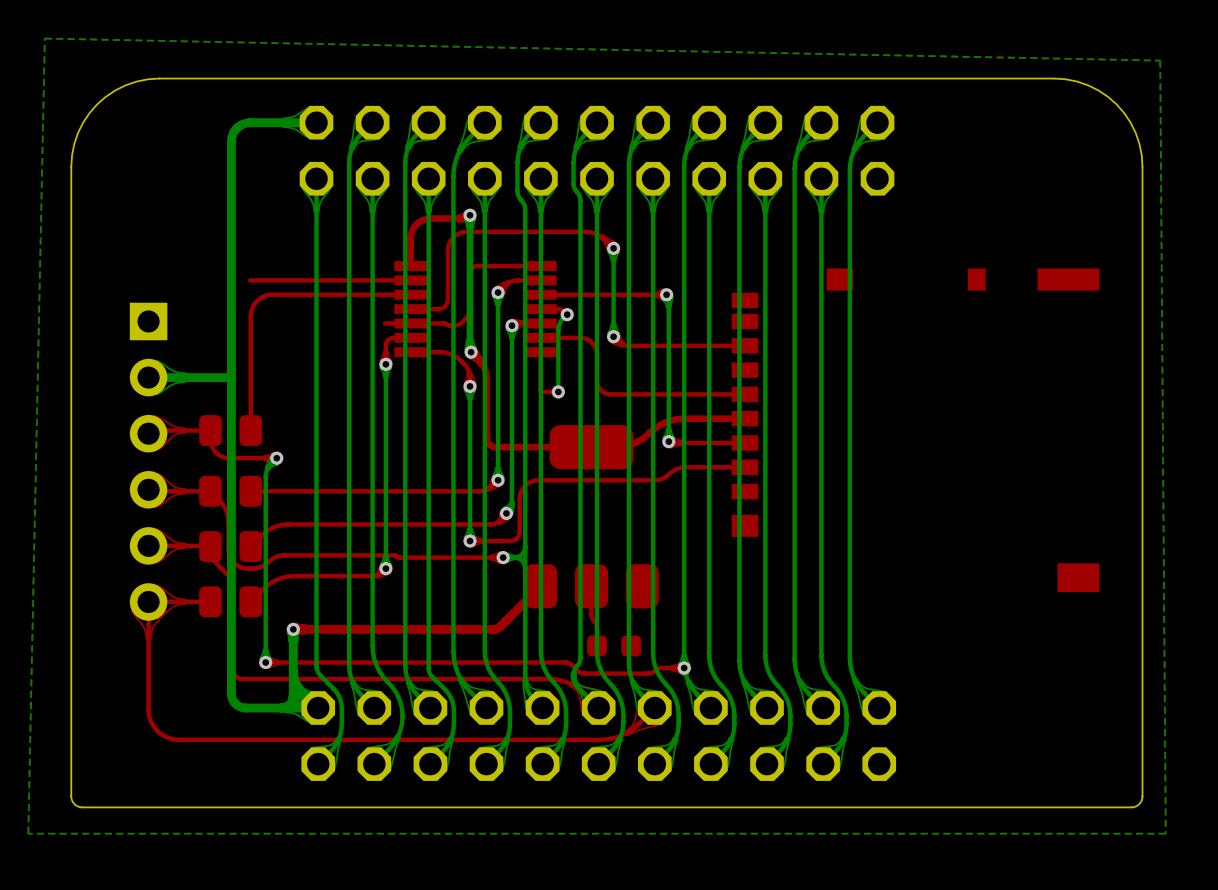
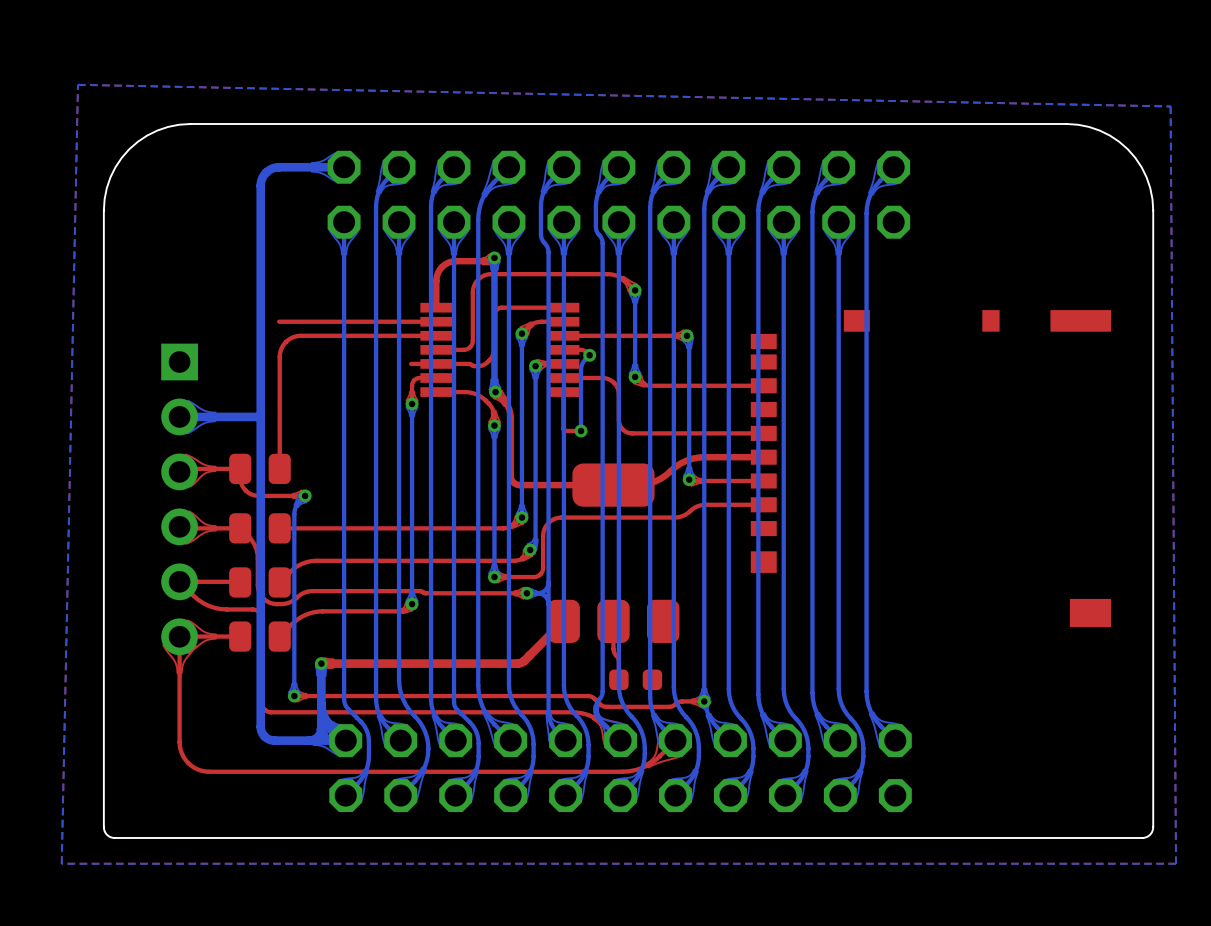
top zone outline: (156, 528) (139, 545) (156, 562) (174, 550) (185, 548) (185, 543) (174, 541) (156, 528) -> none
top track: (210, 546) (210, 557) (229, 576) -> (199, 581) (193, 584) (191, 590) (193, 595) (203, 603) (220, 609) (253, 609) (259, 612)

